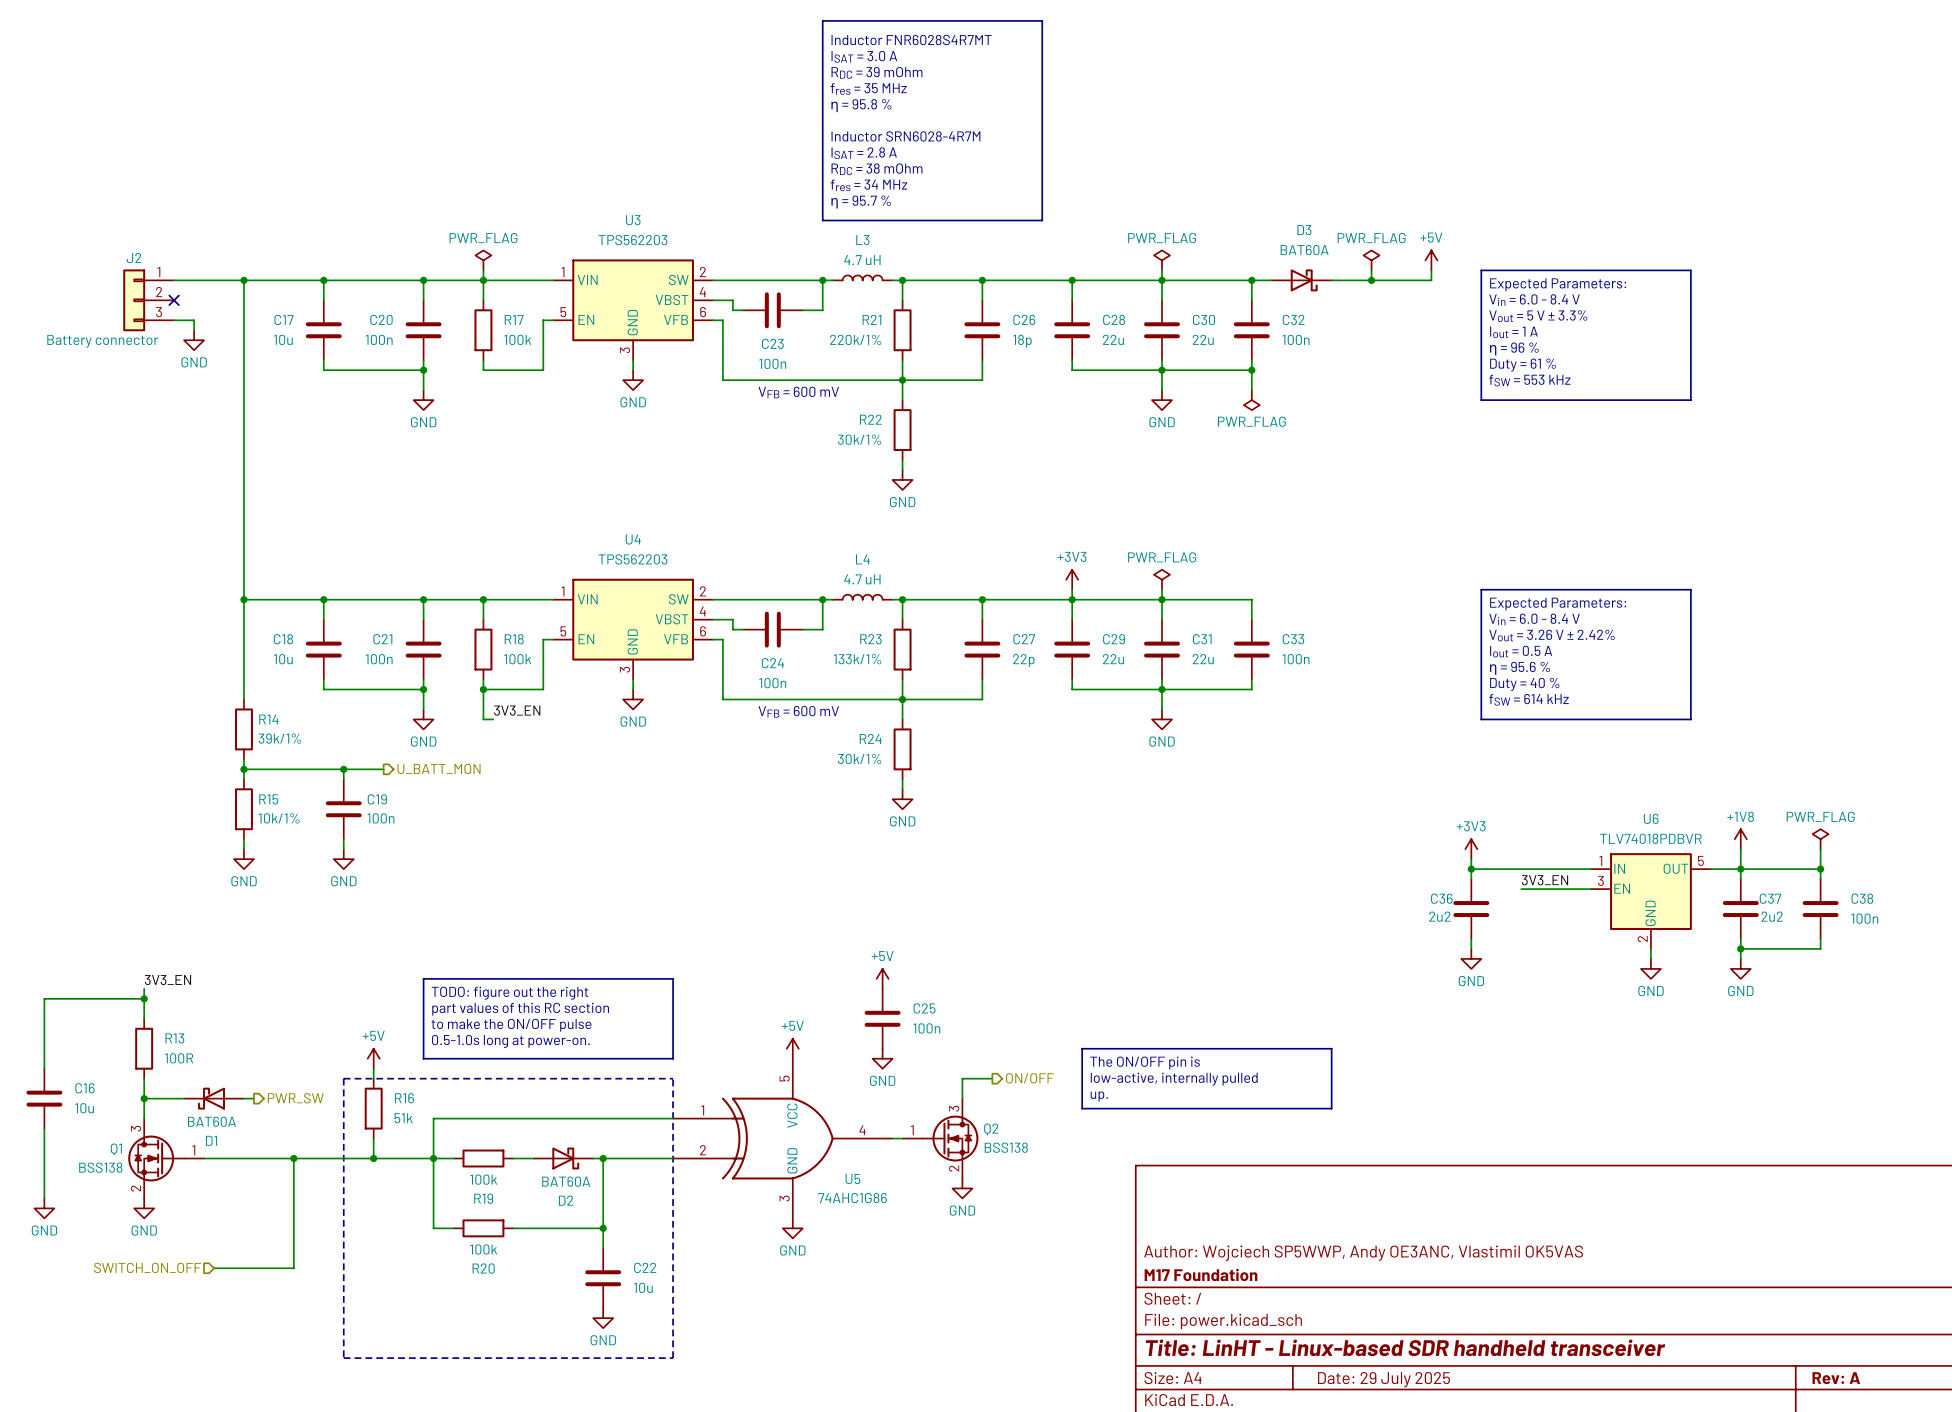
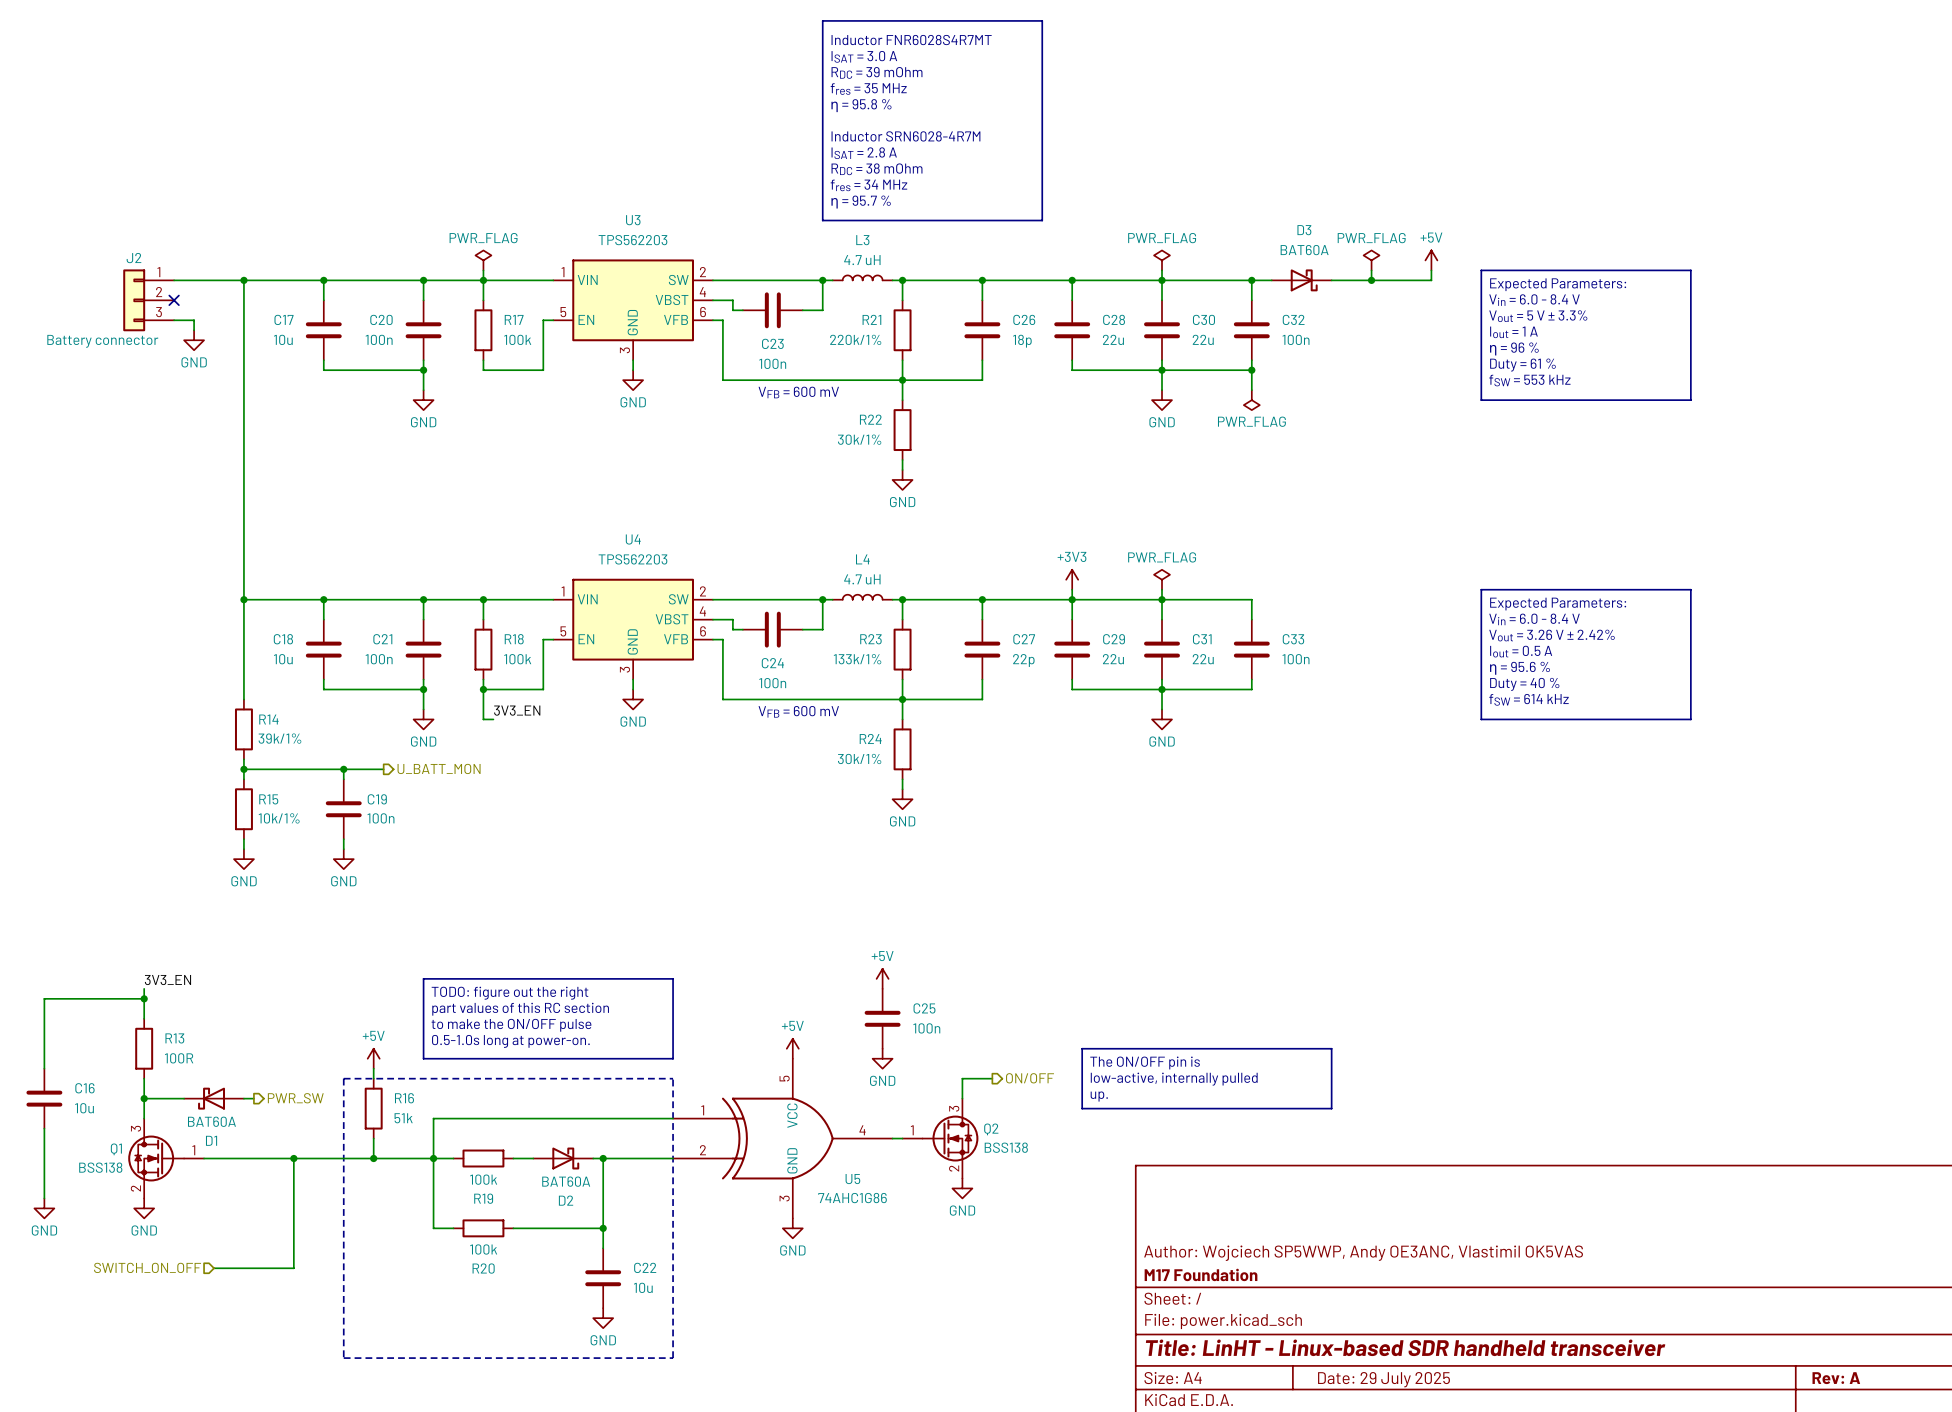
power symbol: +1V8 (1740, 839) -> none
power symbol: PWR_FLAG (1820, 839) -> none
power symbol: +3V3 (1471, 849) -> none
wire: (1740, 849) (1740, 879) -> none
wire: (1820, 849) (1820, 879) -> none
wire: (1471, 859) (1471, 879) -> none
wire: (1471, 869) (1591, 869) -> none
junction: (1471, 869) -> none
wire: (1710, 869) (1820, 869) -> none
junction: (1740, 869) -> none
junction: (1820, 869) -> none
label: 3V3_EN (1545, 880) -> none
wire: (1521, 889) (1591, 889) -> none
U6: TLV74018PDBVR (1650, 901) -> none
C36: 2u2 (1471, 909) -> none
C37: 2u2 (1740, 909) -> none
C38: 100n (1820, 909) -> none
wire: (1471, 938) (1471, 948) -> none
wire: (1740, 938) (1740, 958) -> none
wire: (1820, 938) (1820, 948) (1740, 948) -> none
wire: (1650, 948) (1650, 958) -> none
junction: (1740, 948) -> none
power symbol: GND (1471, 958) -> none
power symbol: GND (1650, 968) -> none
power symbol: GND (1740, 968) -> none

